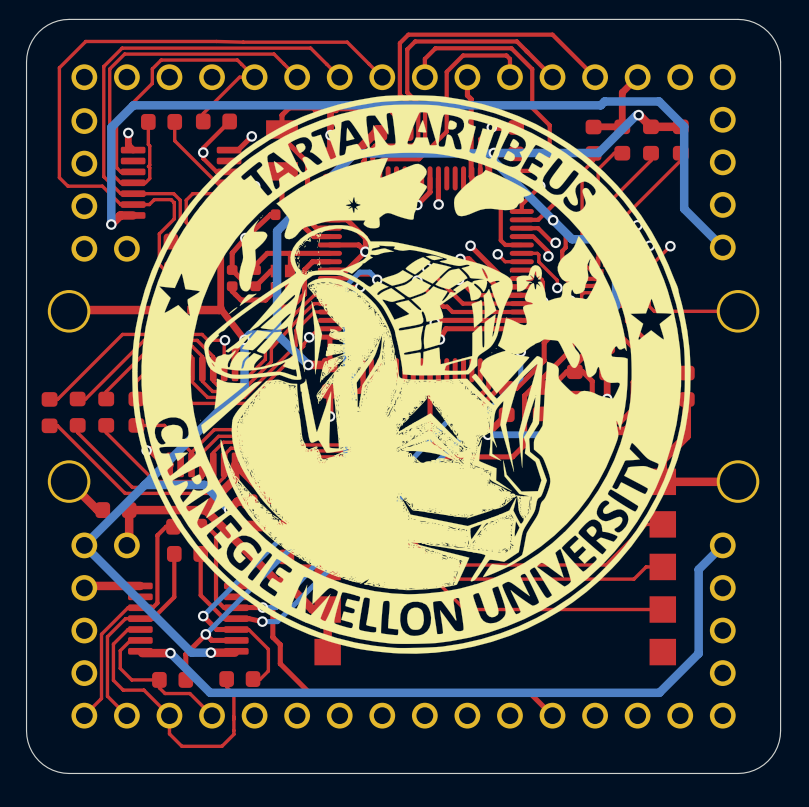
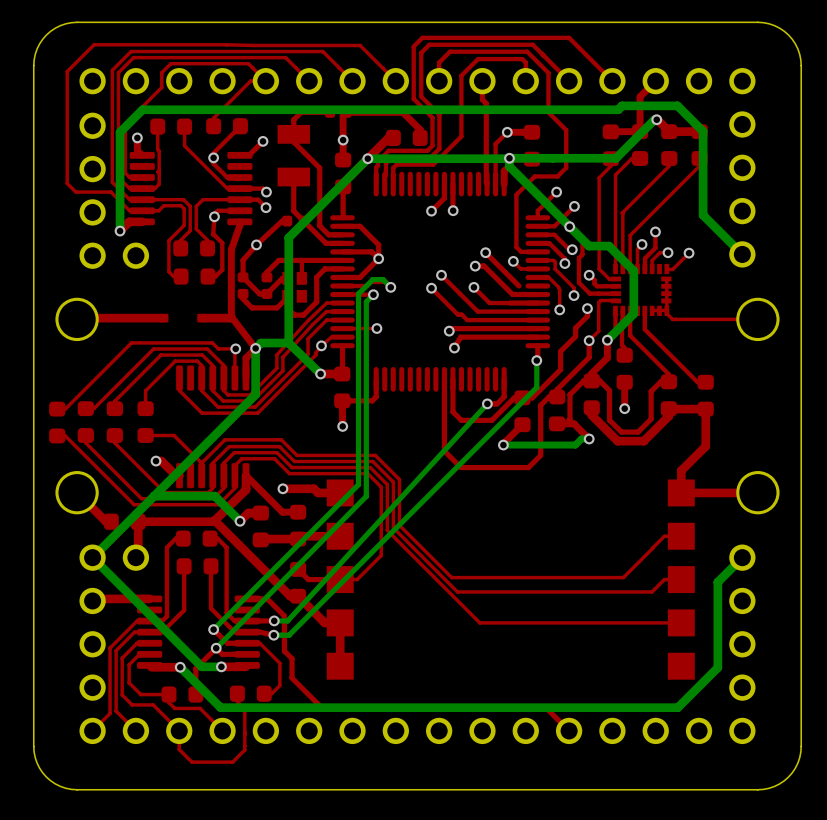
drawing: [132, 95, 691, 654] -> none

